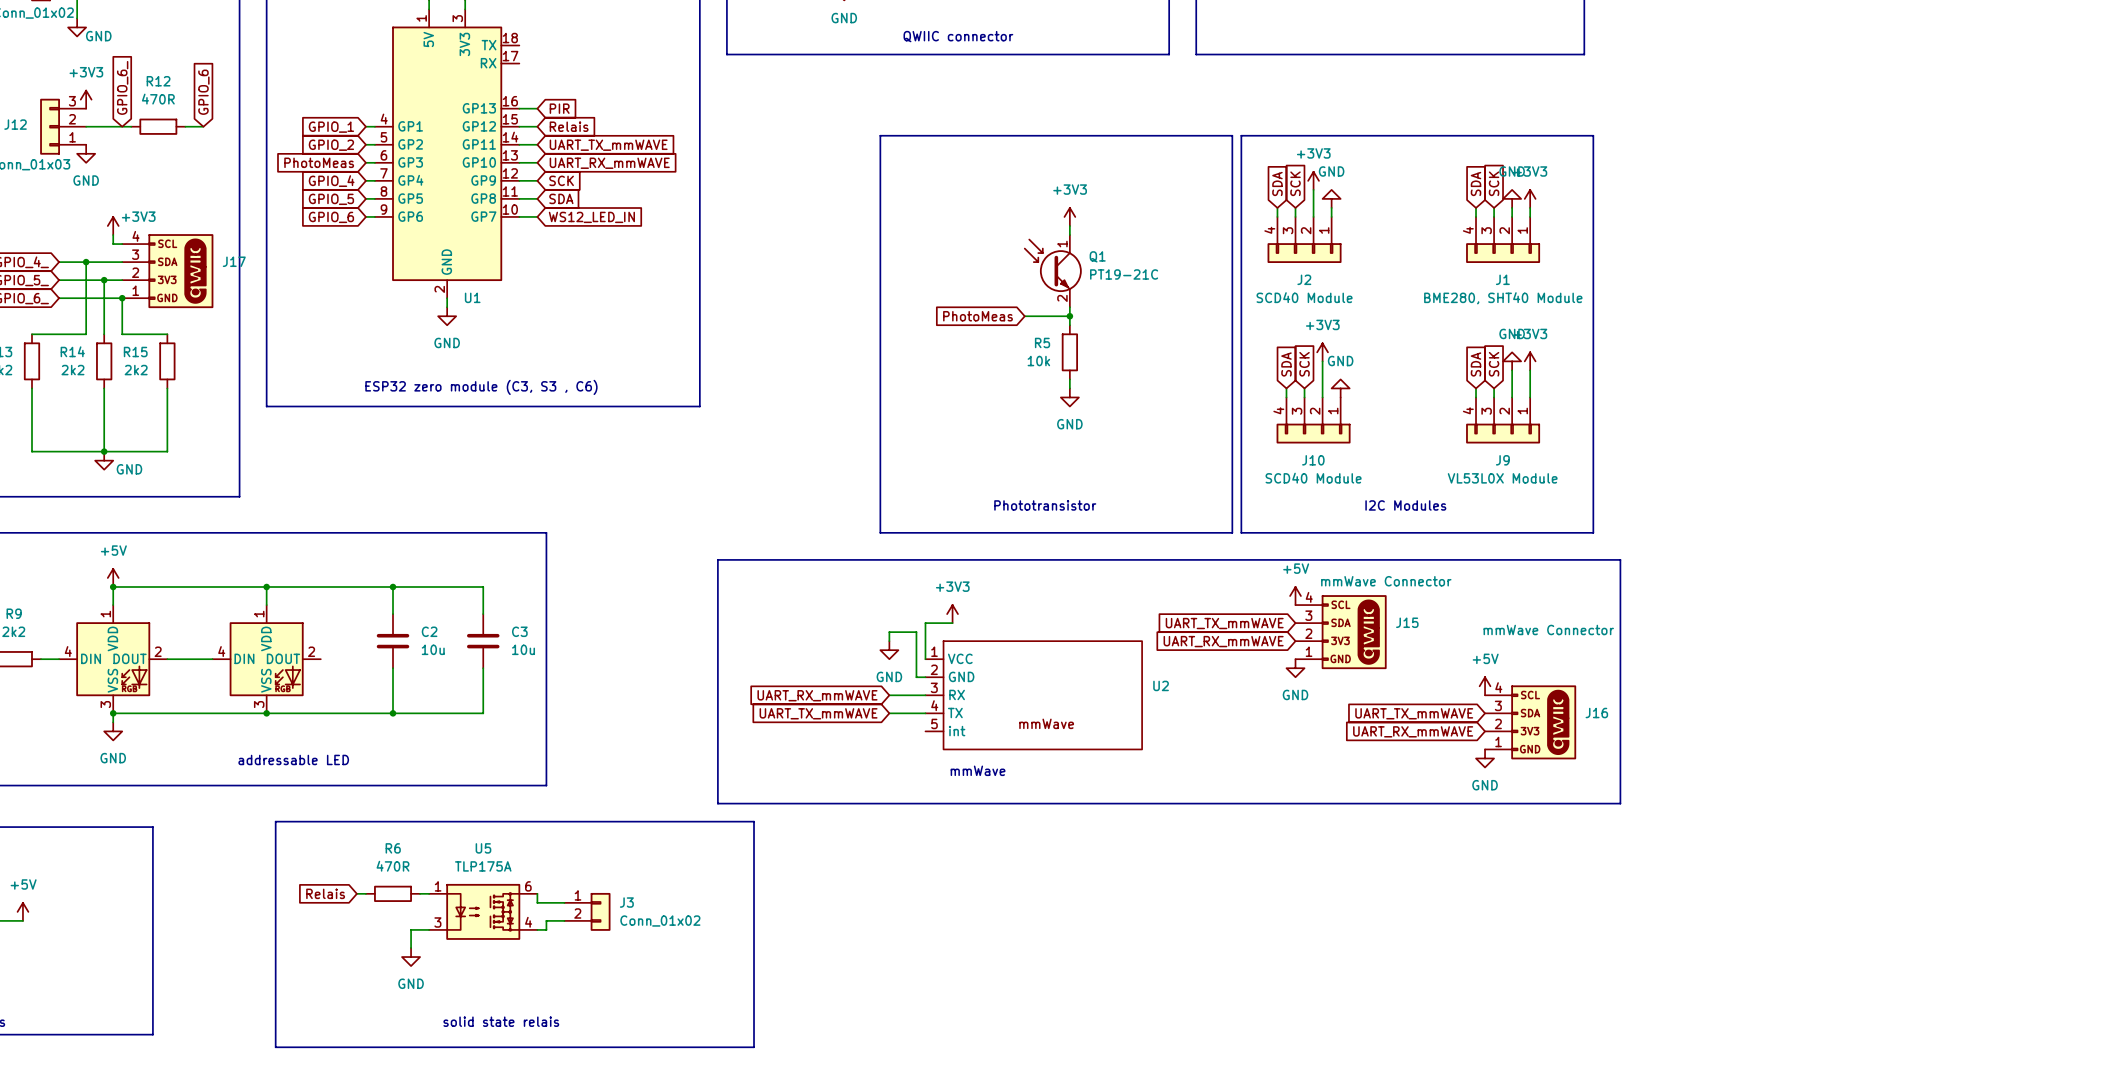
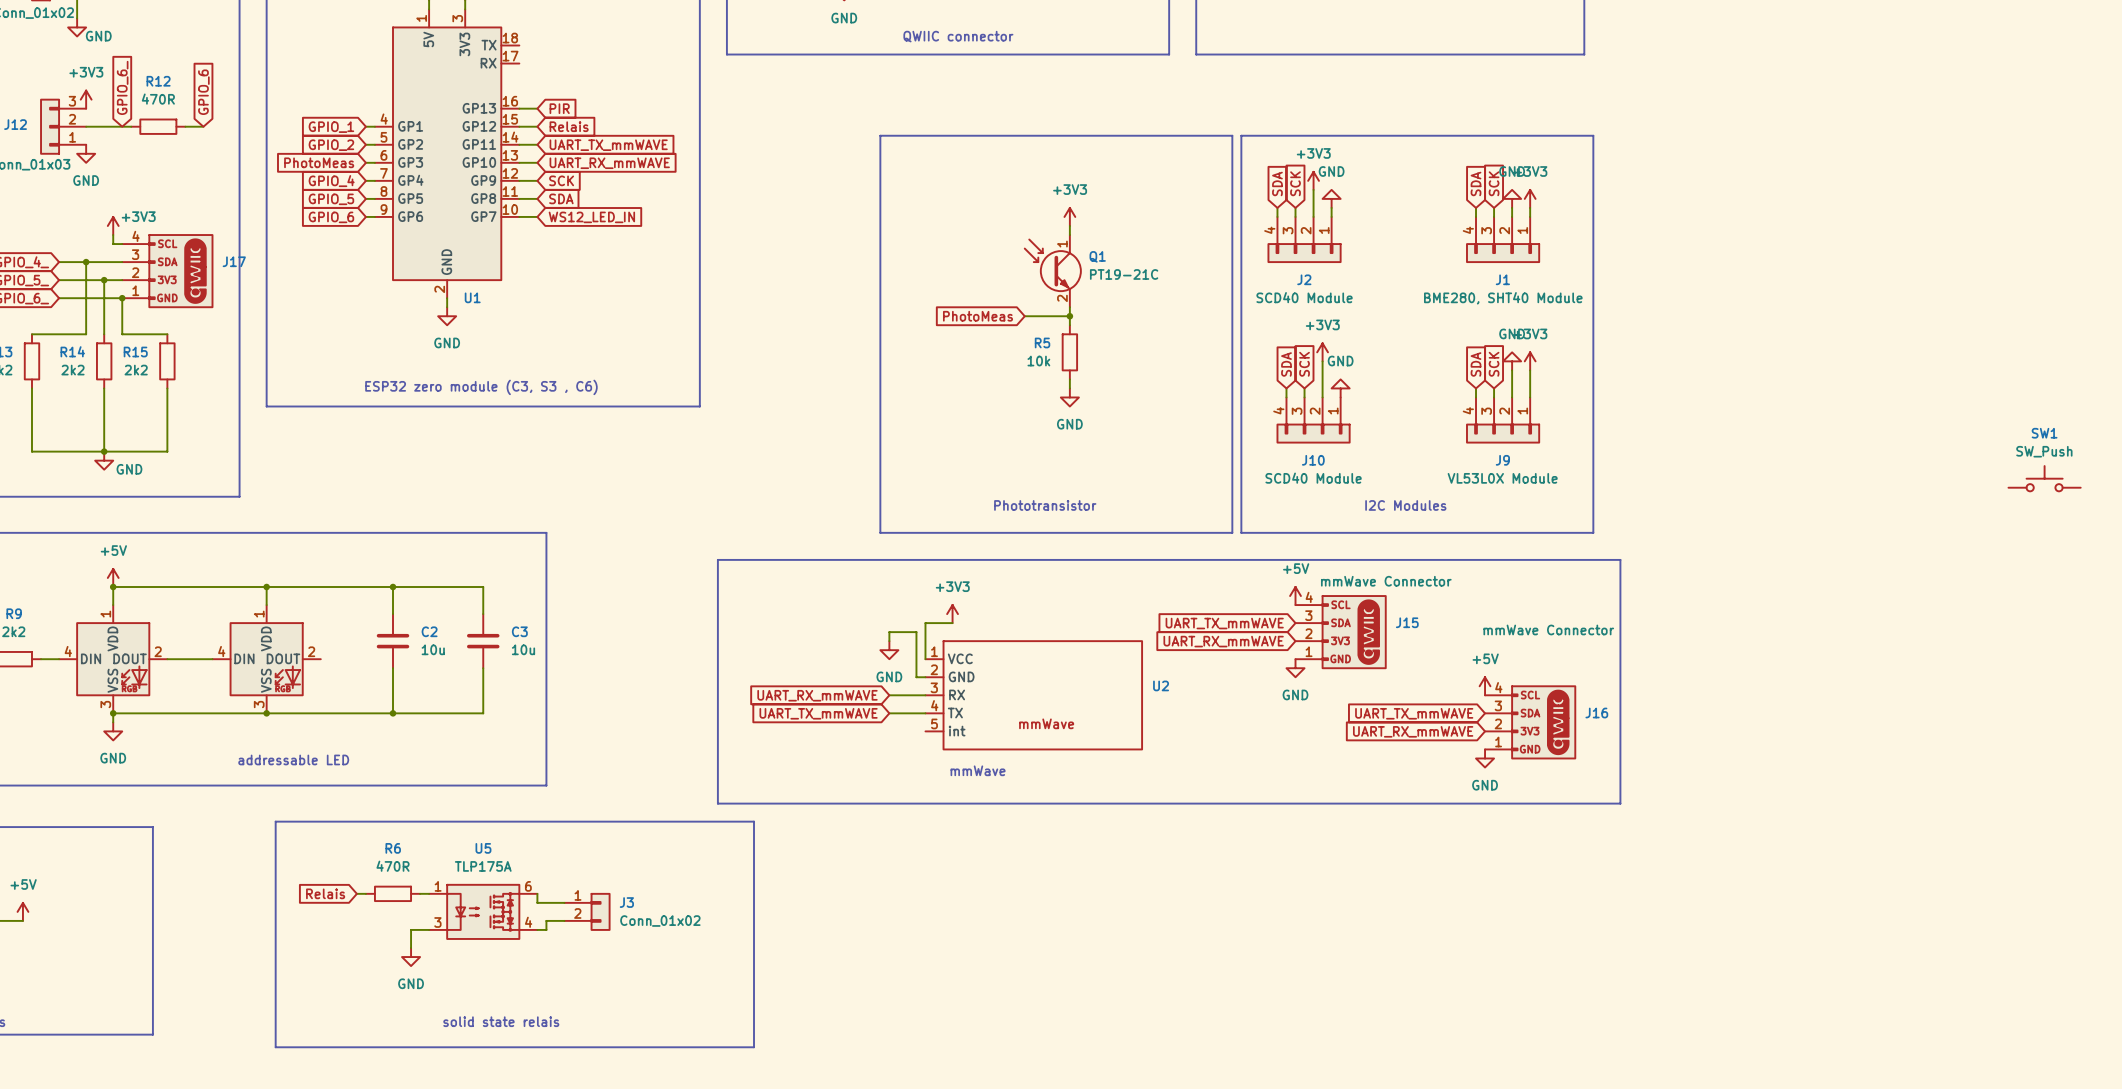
SW1: none -> SW_Push (2044, 478)

